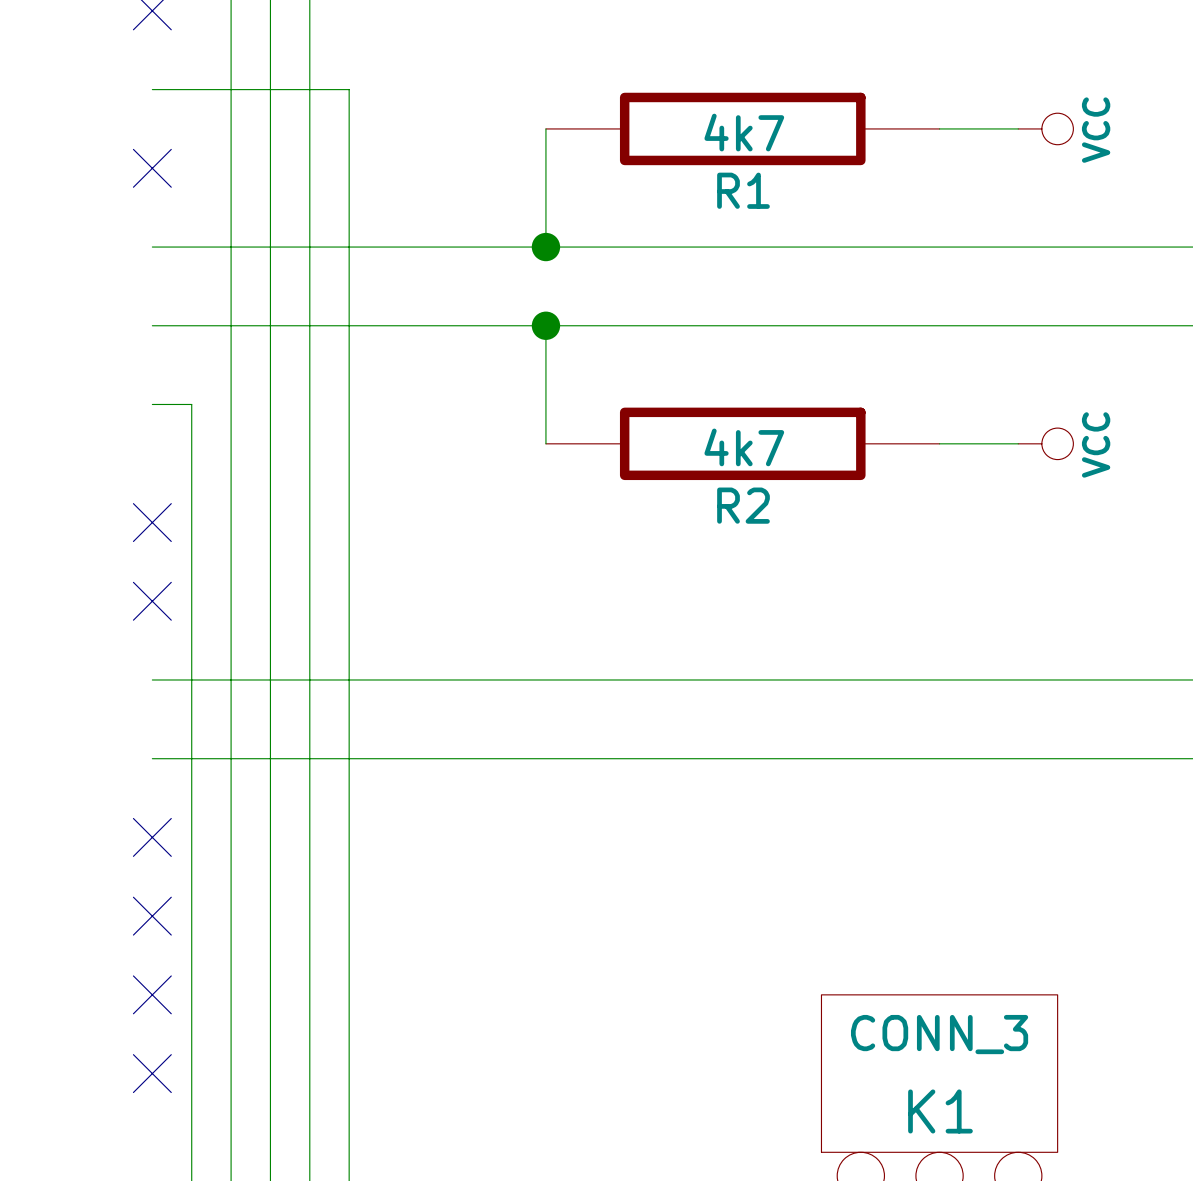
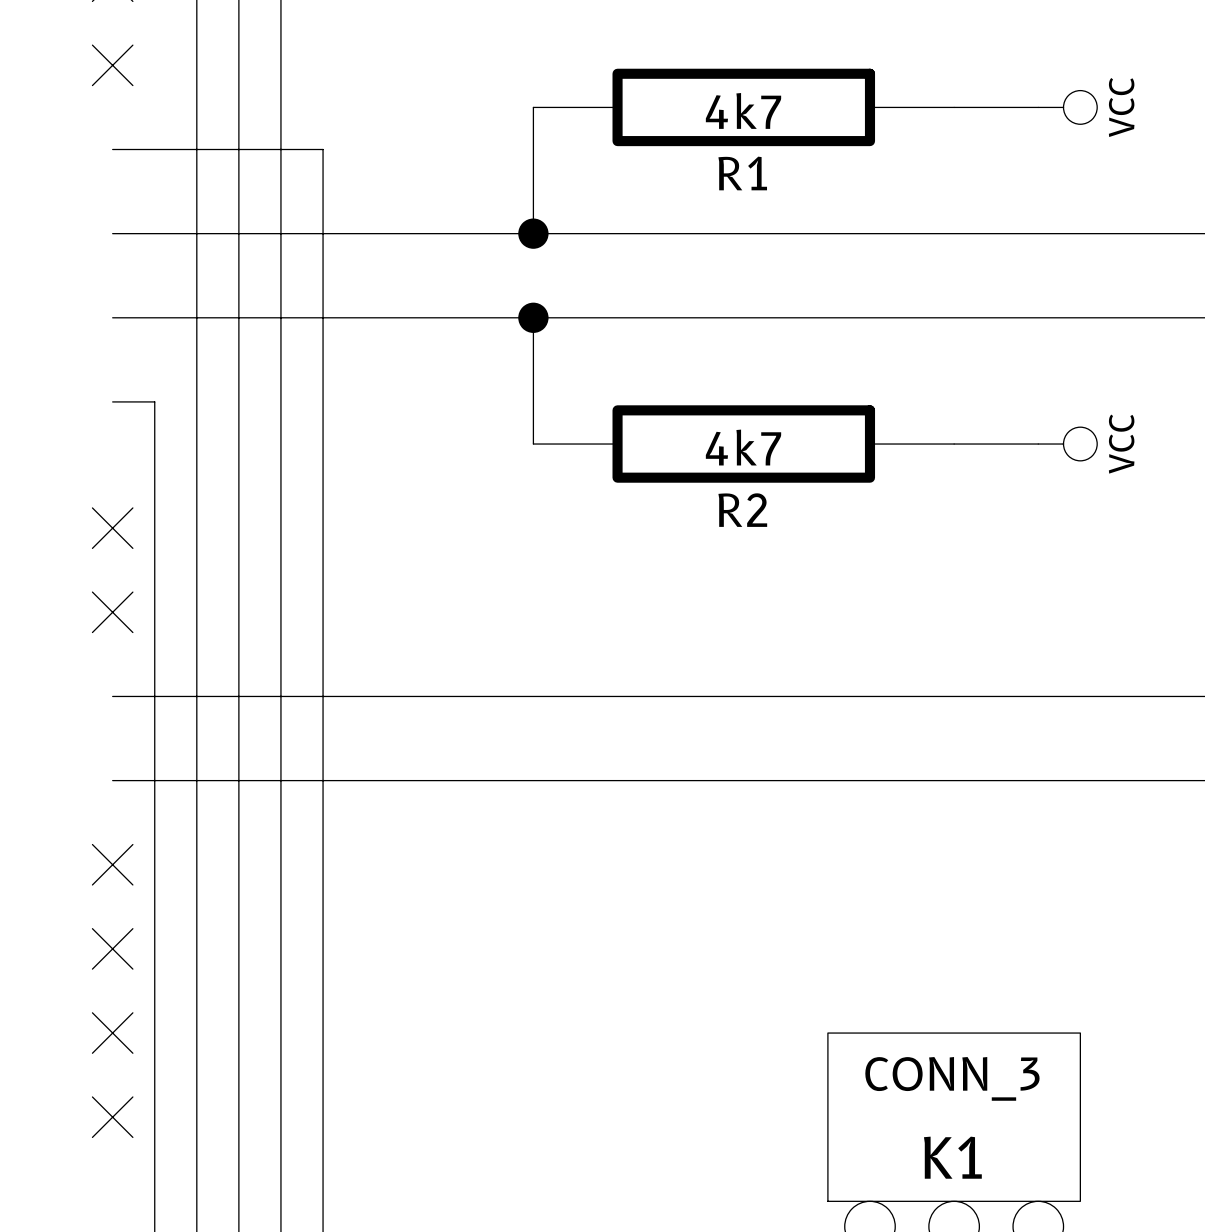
wire: (152, 89) (349, 89) (349, 168) -> (112, 149) (323, 149)
no-connect mark position: (152, 168) -> (112, 65)

